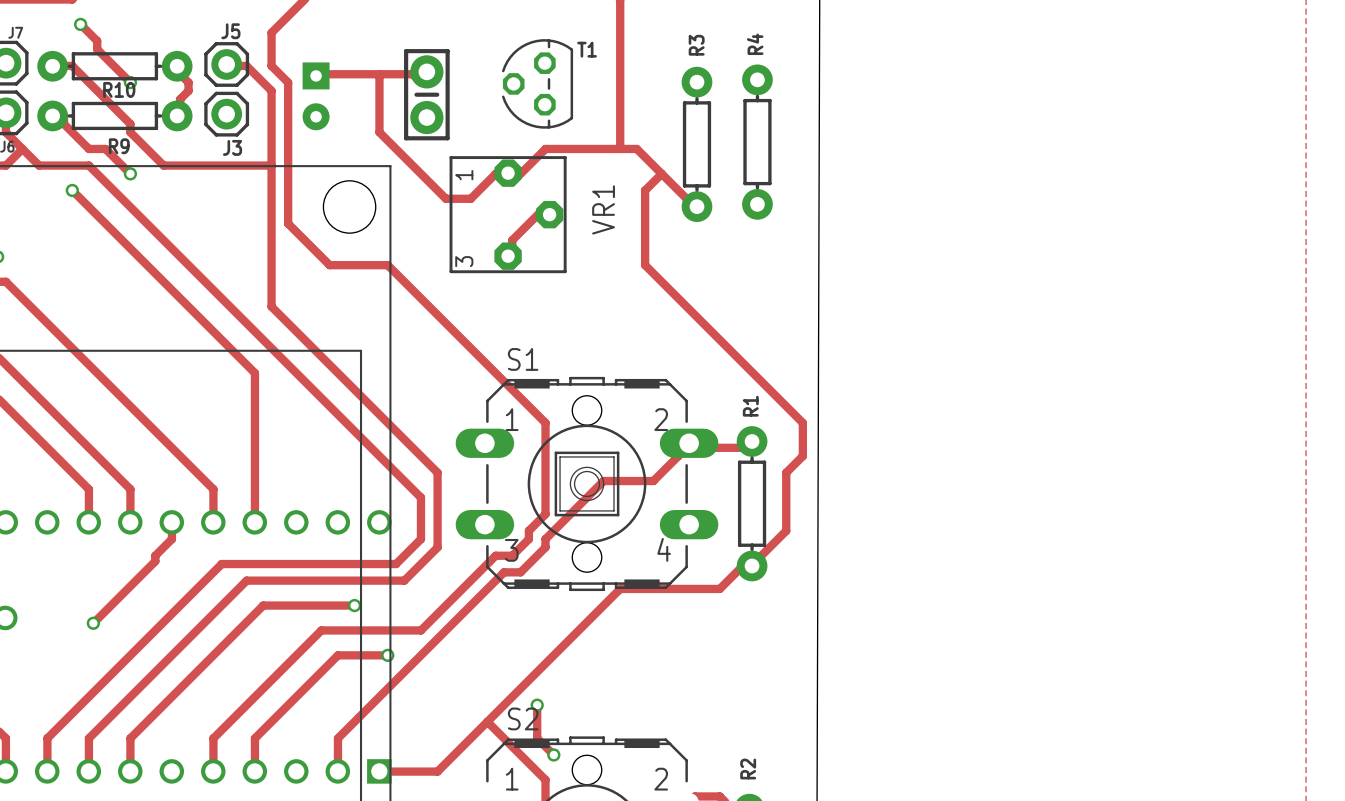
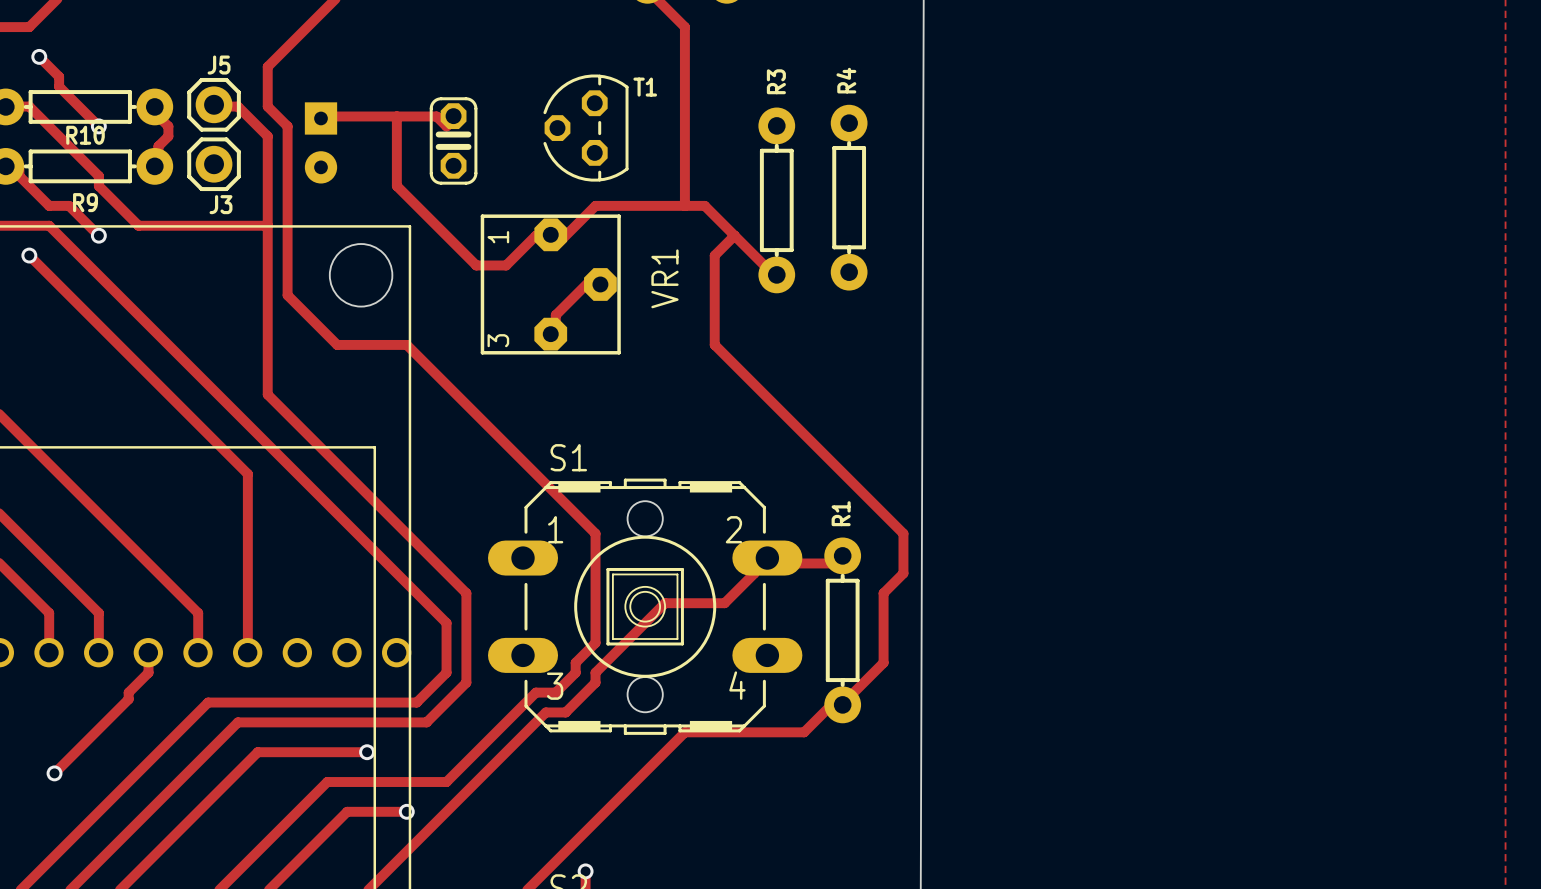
part footprint: [404, 49, 450, 141] -> [429, 97, 478, 185]

